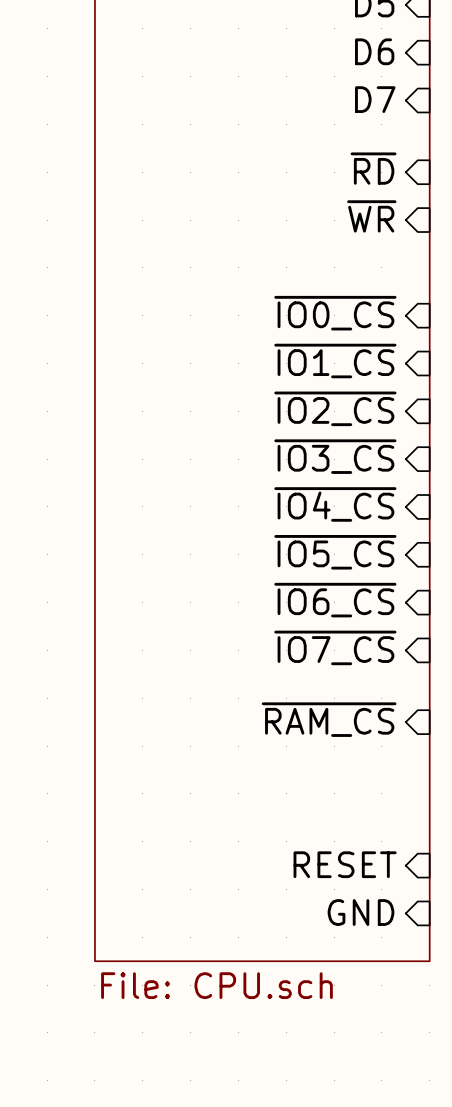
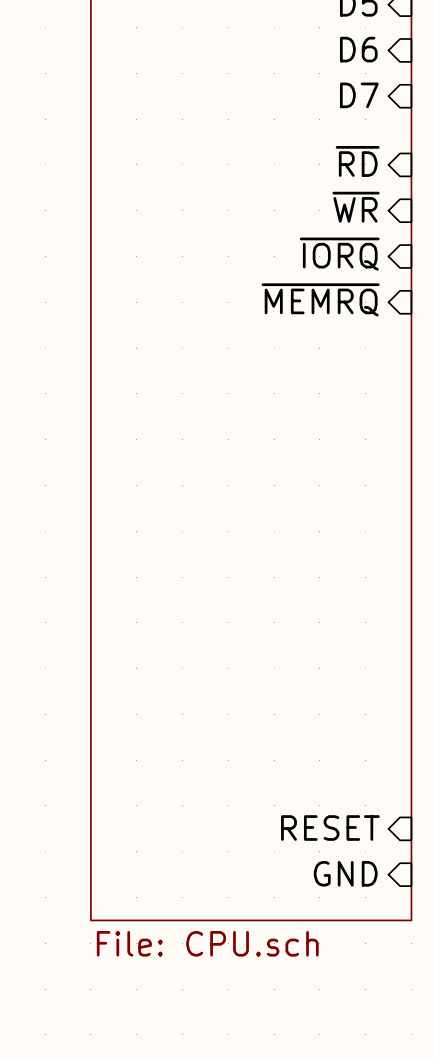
sheet pin: none -> ~{IORQ} (339, 254)
sheet pin: ~{IO0_CS} (335, 313) -> ~{MEMRQ} (320, 299)
sheet pin: ~{IO1_CS} (335, 361) -> none
sheet pin: ~{IO2_CS} (335, 408) -> none
sheet pin: ~{IO3_CS} (335, 456) -> none
sheet pin: ~{IO4_CS} (335, 504) -> none
sheet pin: ~{IO5_CS} (335, 552) -> none
sheet pin: ~{IO6_CS} (335, 600) -> none
sheet pin: ~{IO7_CS} (335, 647) -> none
sheet pin: ~{RAM_CS} (329, 719) -> none

